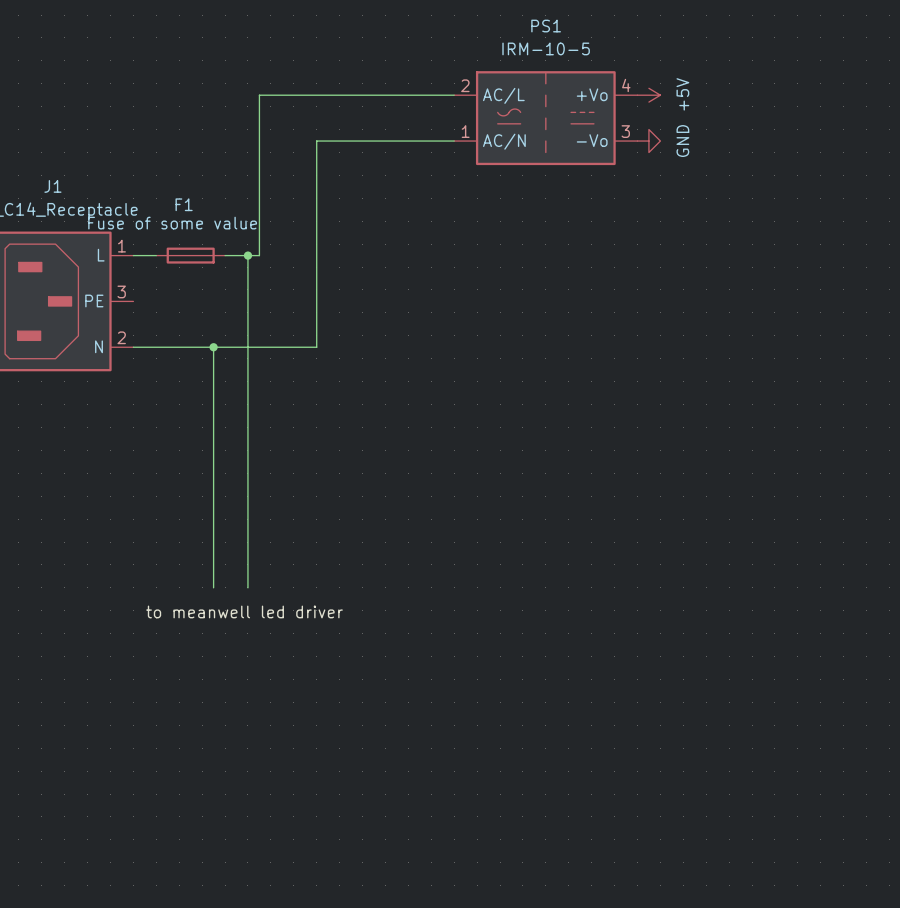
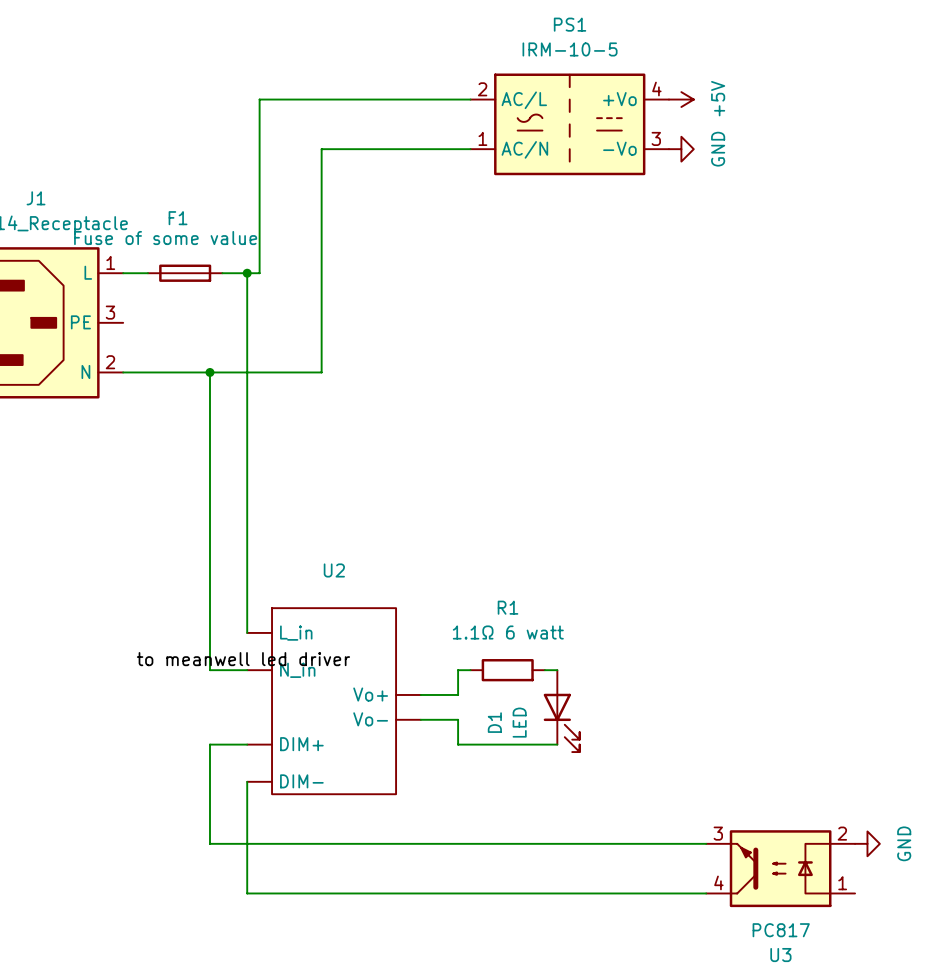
wire: none -> (209, 632) (209, 670) (247, 670)
wire: none -> (470, 670) (458, 670) (458, 694) (420, 694)
R1: none -> 1.1Ω 6 watt (507, 670)
wire: none -> (544, 670) (557, 670)
U2: none -> (334, 701)
D1: none -> LED (561, 711)
wire: none -> (420, 719) (458, 719) (458, 744) (557, 744)
wire: none -> (247, 744) (209, 744) (209, 843) (706, 843)
wire: none -> (247, 781) (247, 893) (706, 893)
power symbol: none -> GND (867, 843)
U3: none -> PC817 (780, 868)

